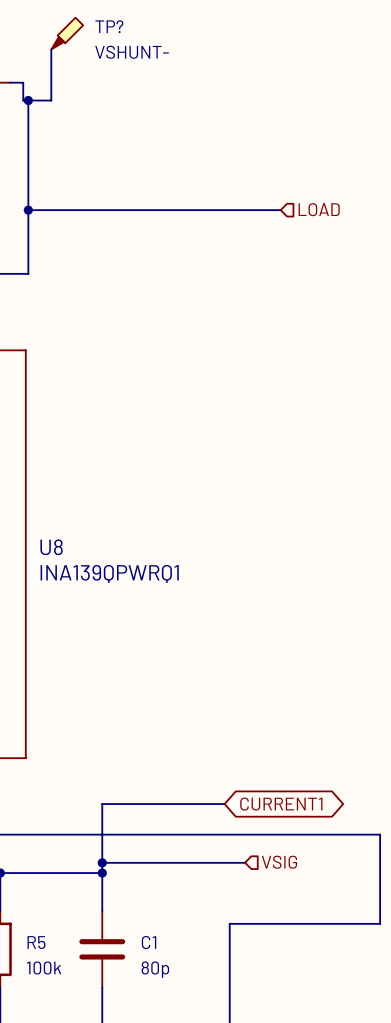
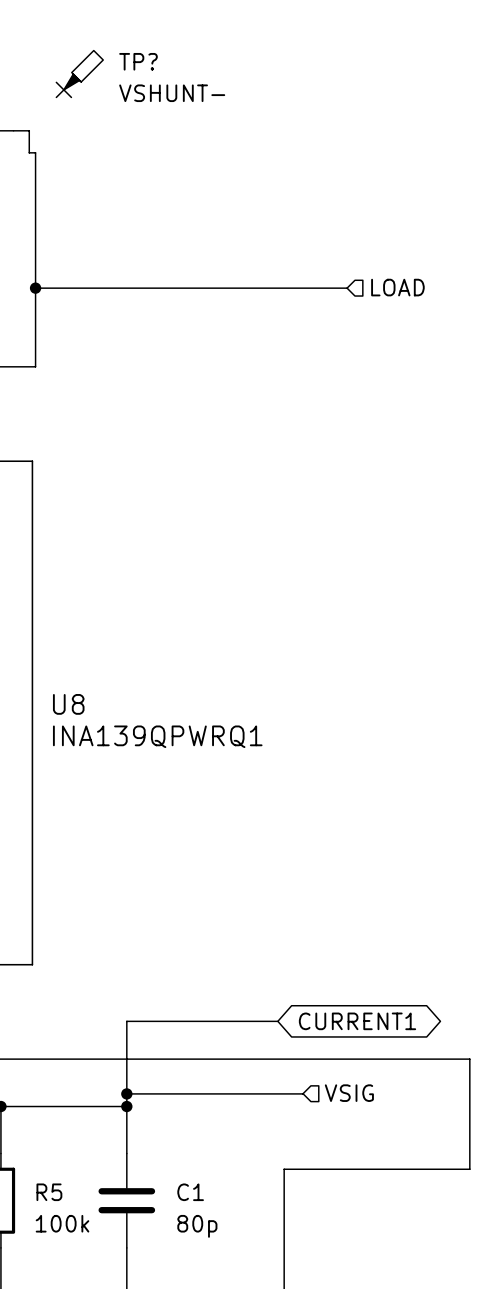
wire: (51, 49) (51, 100) (28, 100) -> none
no-connect mark: none -> (63, 89)
junction: (28, 100) -> none

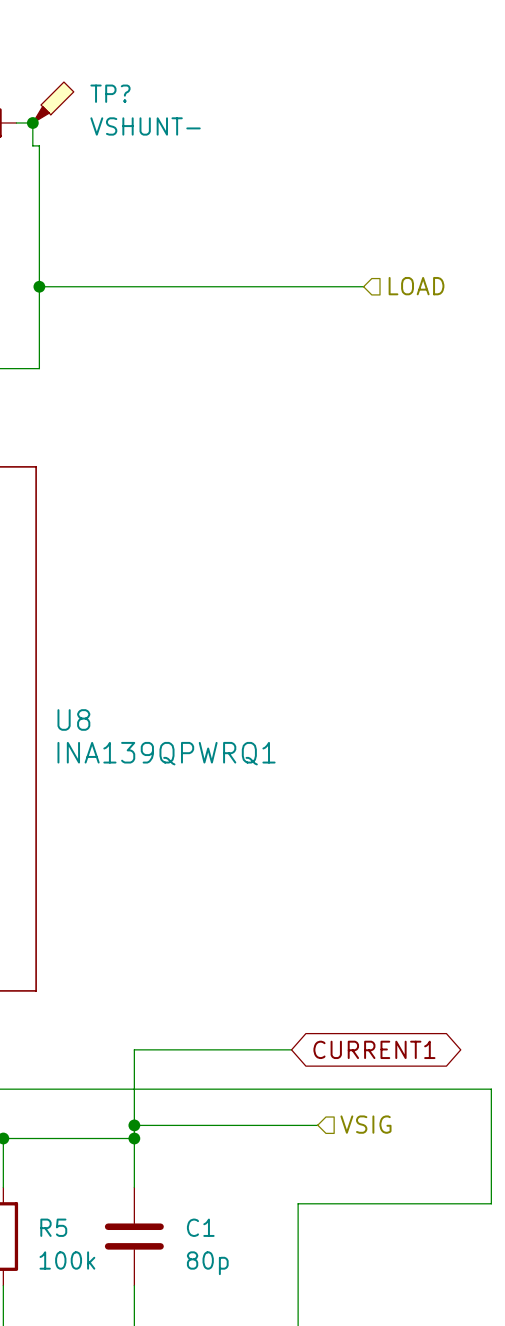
TP? position: (83, 70) -> (53, 102)
no-connect mark: (63, 89) -> none
junction: none -> (32, 122)

